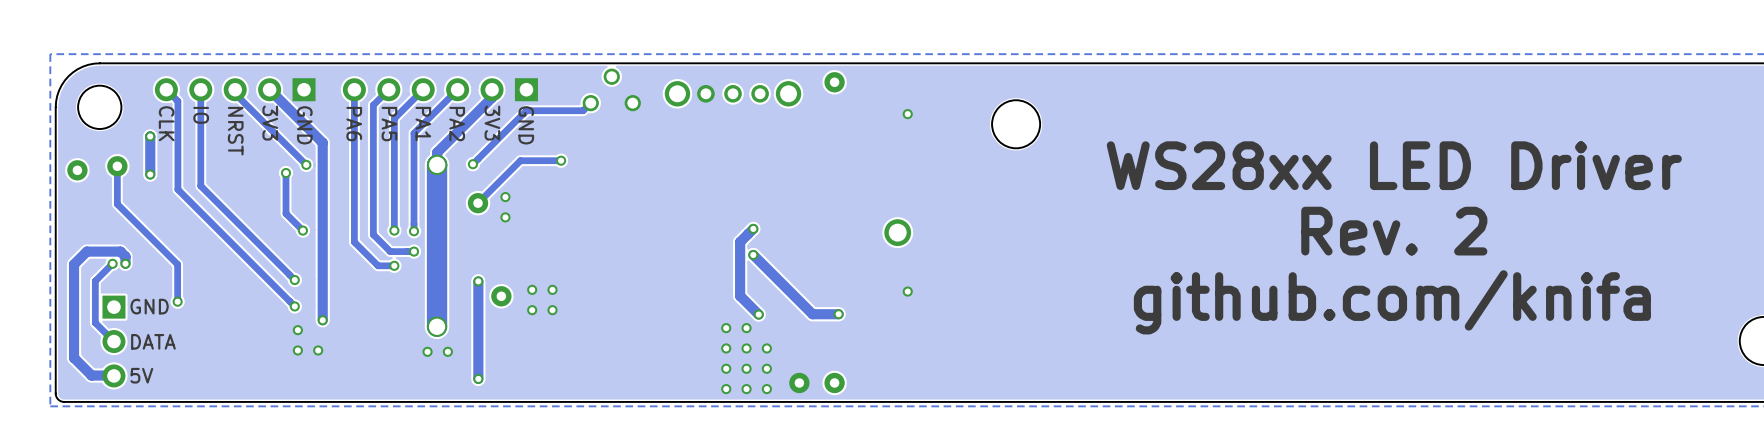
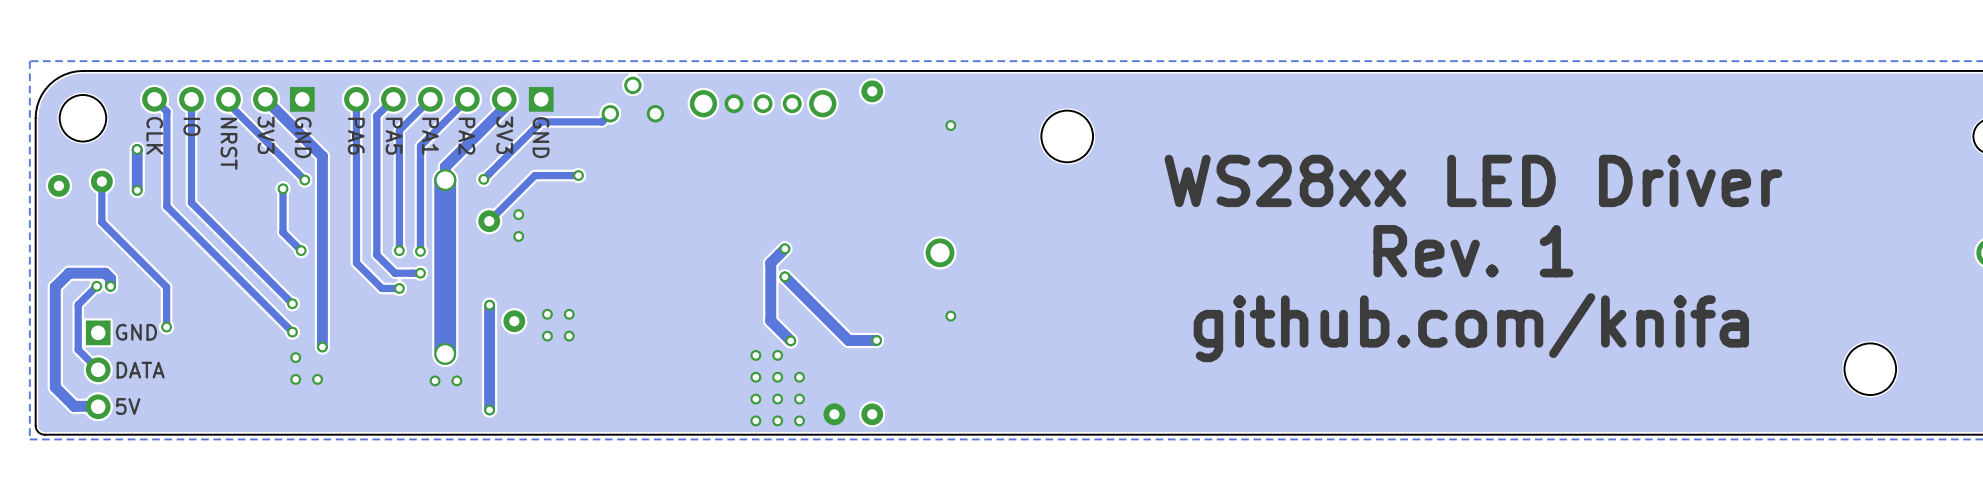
text: Rev. 2 (1394, 231) -> Rev. 1 (1473, 251)

